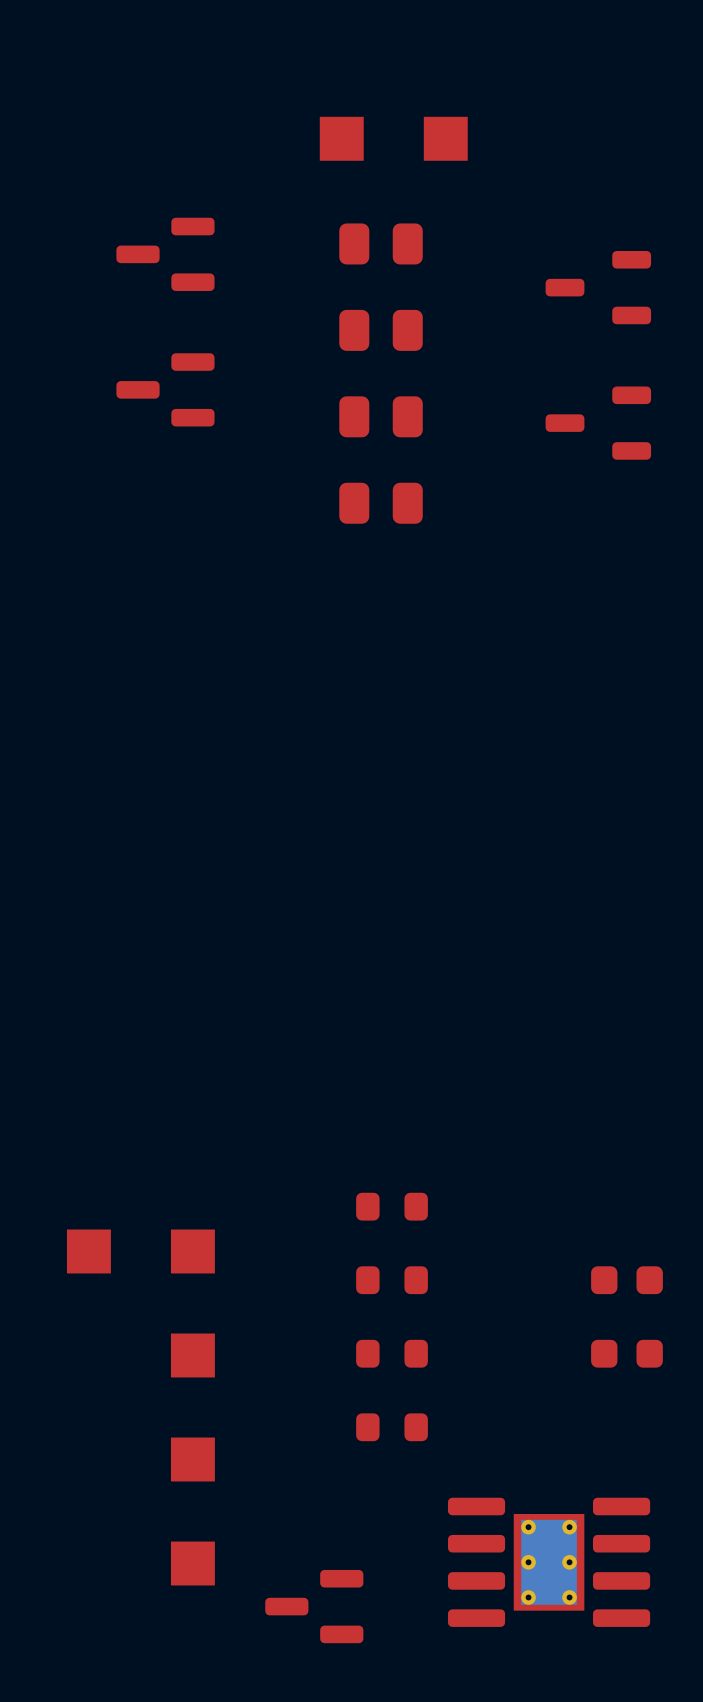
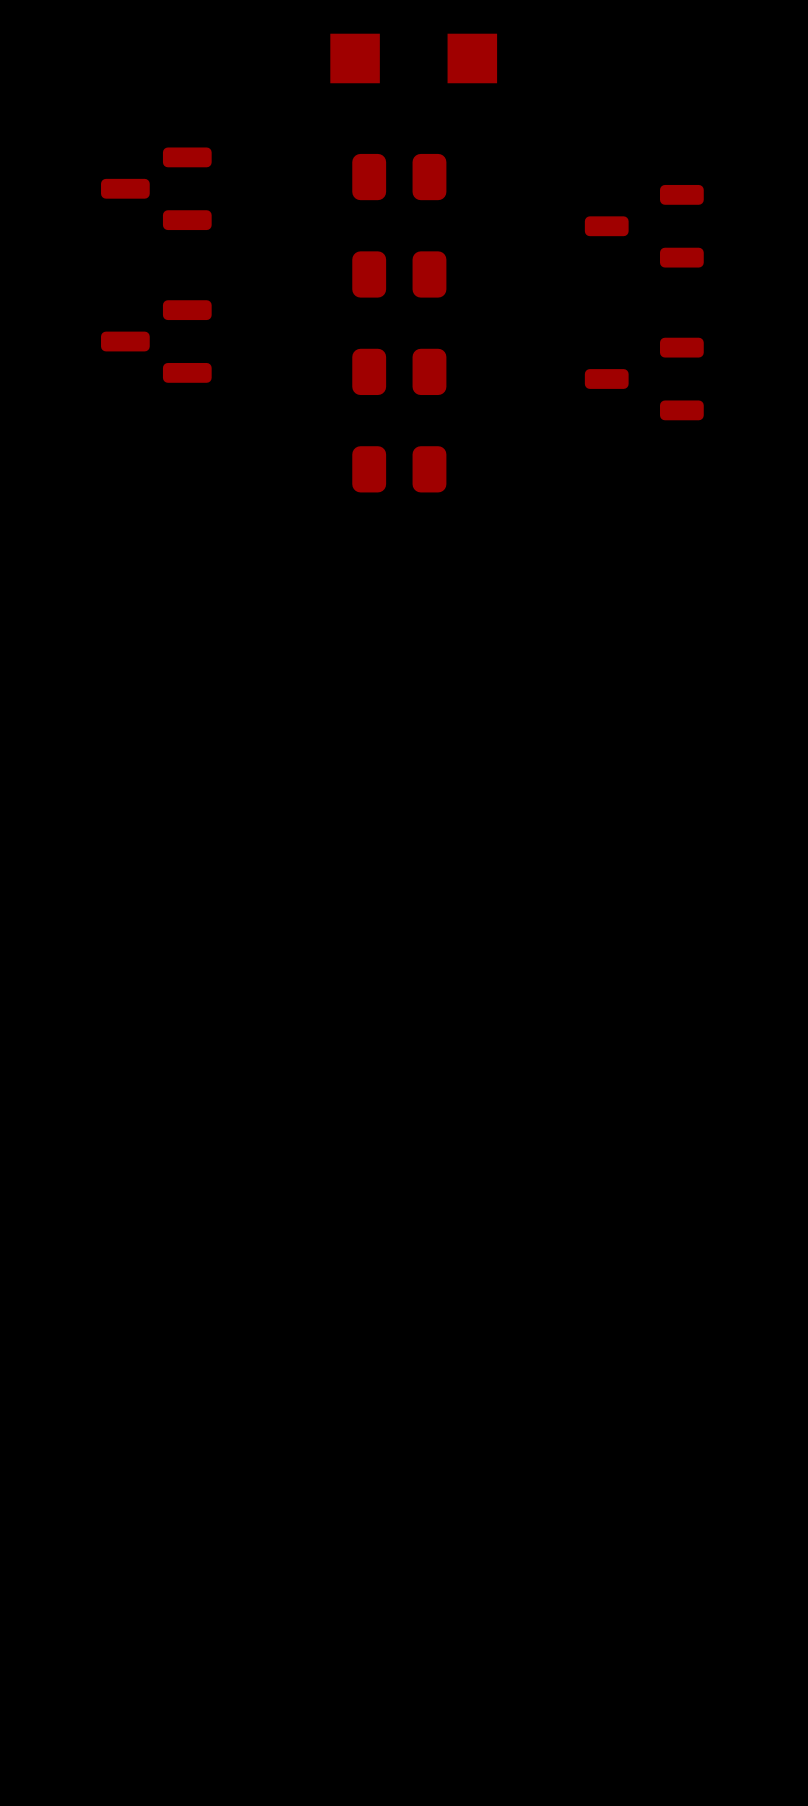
part: (392, 1206) -> none
part: (88, 1251) -> none
part: (192, 1251) -> none
part: (392, 1280) -> none
part: (626, 1280) -> none
part: (392, 1353) -> none
part: (626, 1353) -> none
part: (192, 1355) -> none
part: (392, 1427) -> none
part: (192, 1459) -> none
part: (549, 1562) -> none
part: (192, 1563) -> none
part: (314, 1606) -> none

